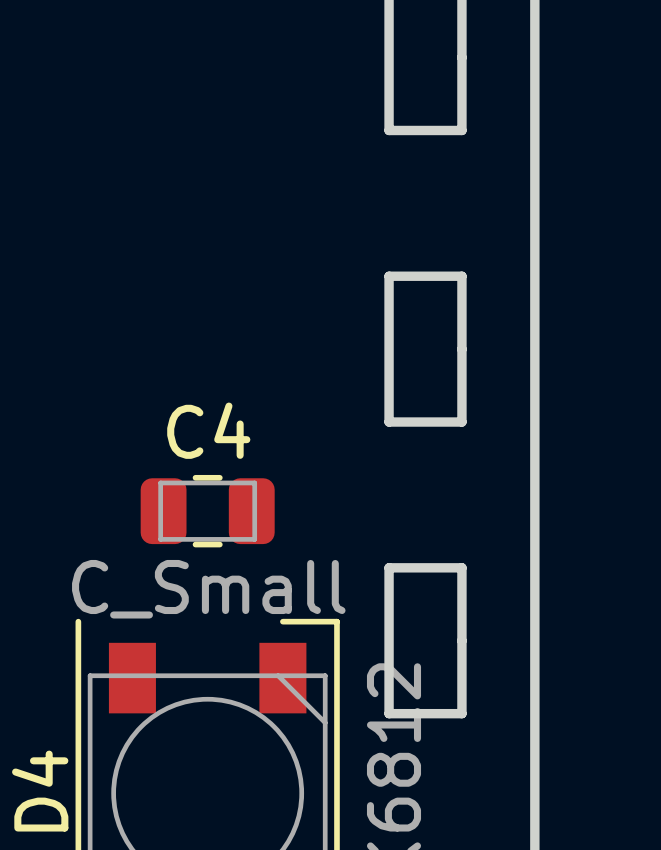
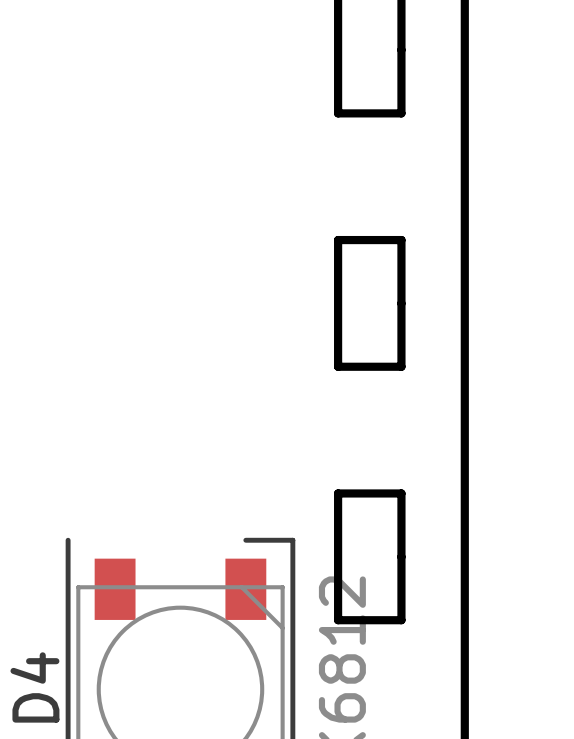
C4: C_Small (207, 511) -> none

